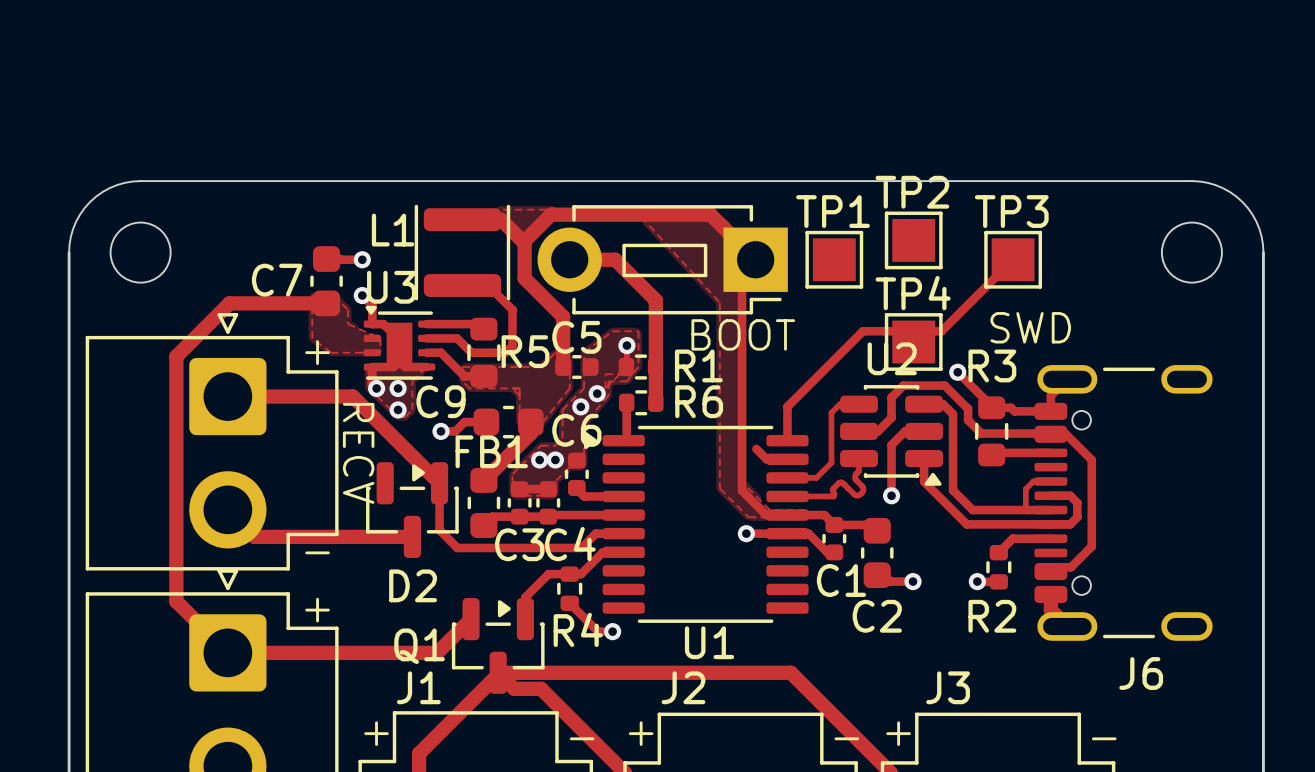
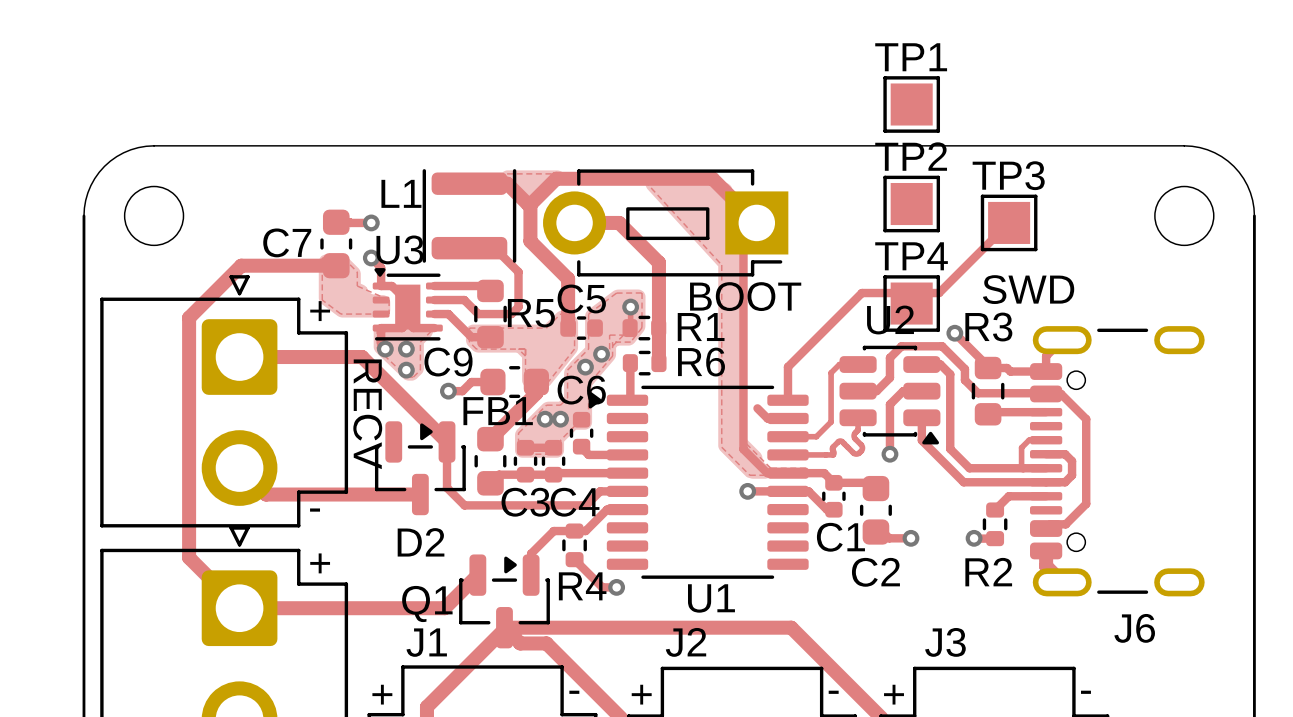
TP1 position: (834, 259) -> (911, 104)

